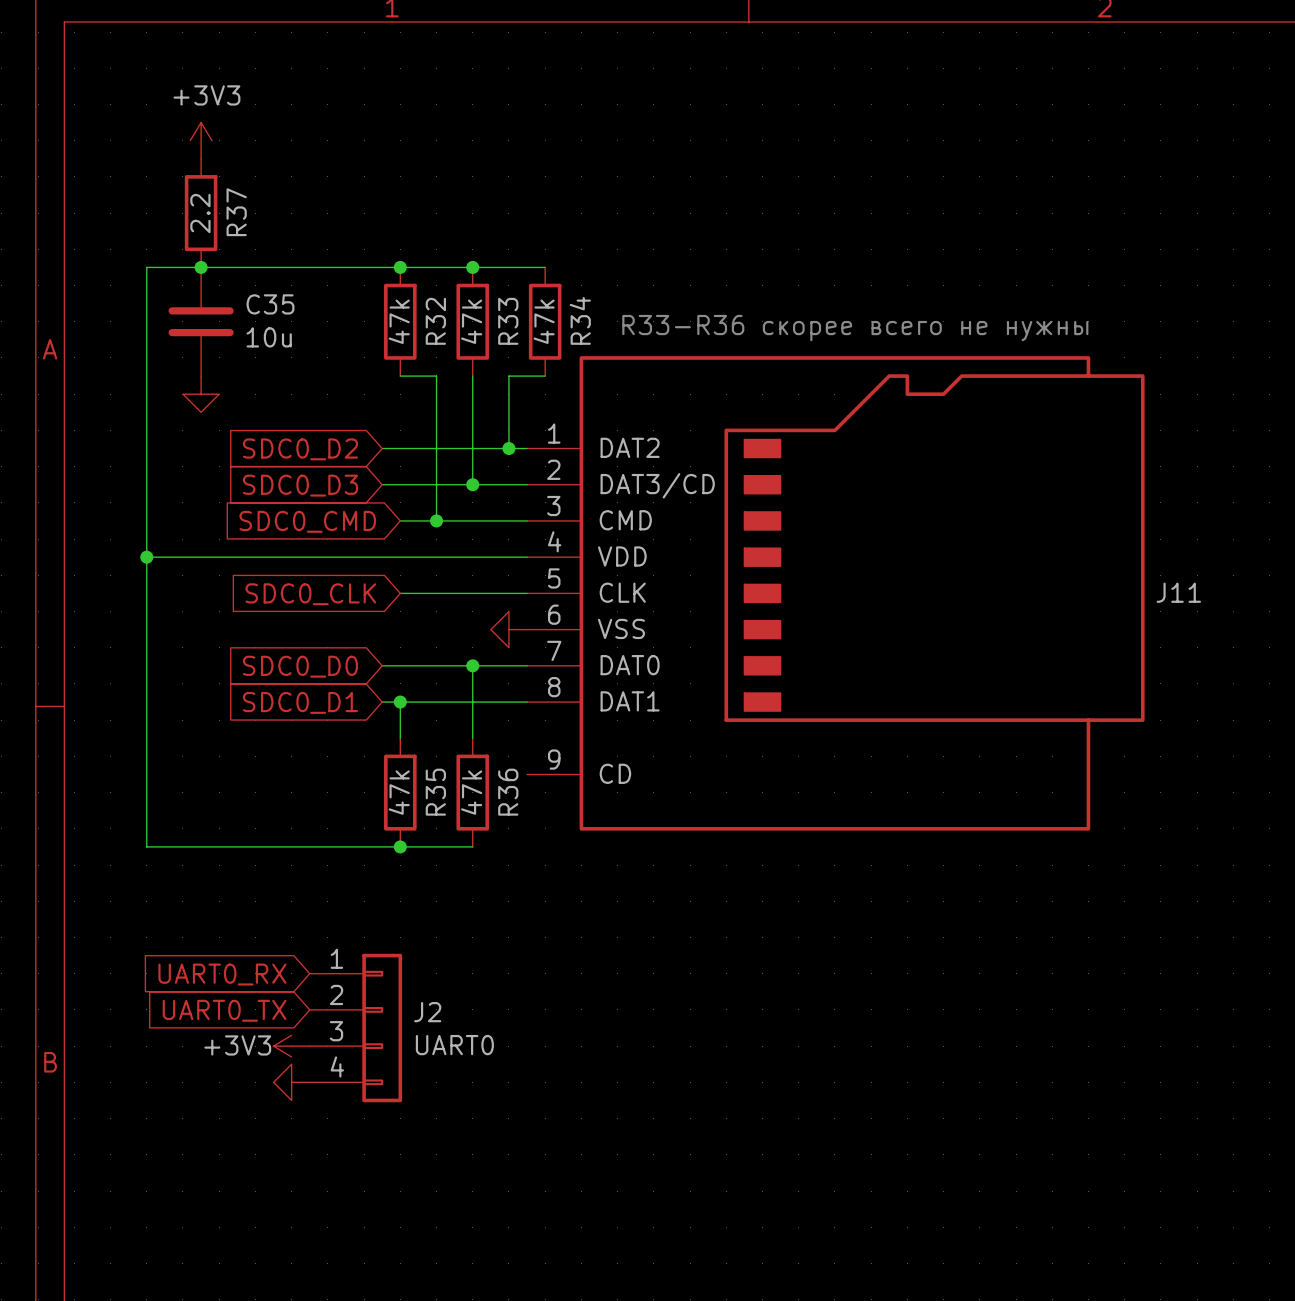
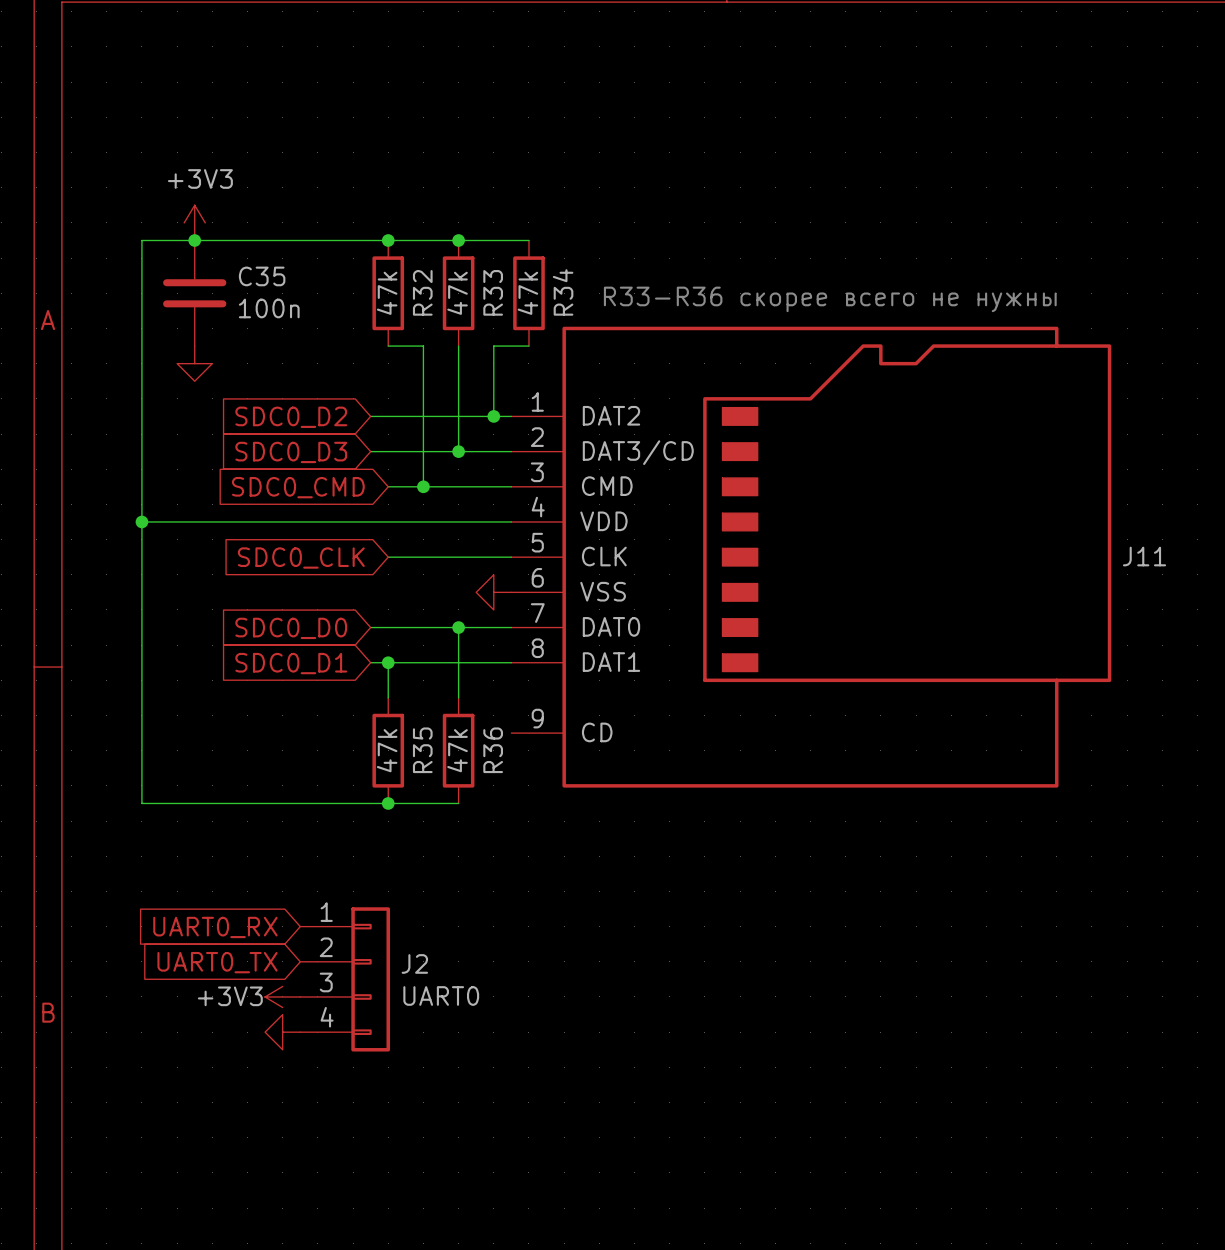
power symbol position: +3V3 (201, 140) -> +3V3 (194, 222)
R37: 2.2 (201, 213) -> none
C35 value: 10u (269, 337) -> 100n (269, 308)

